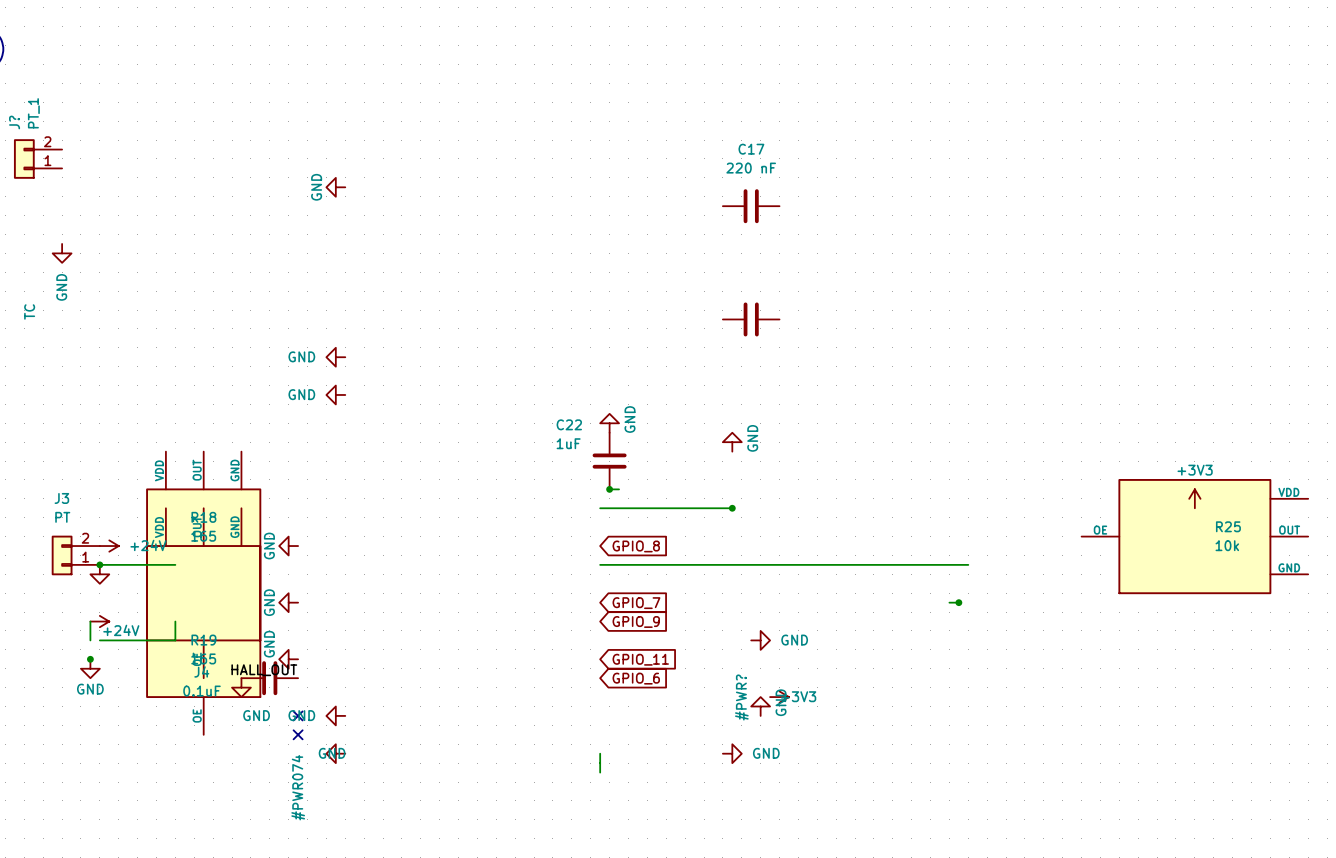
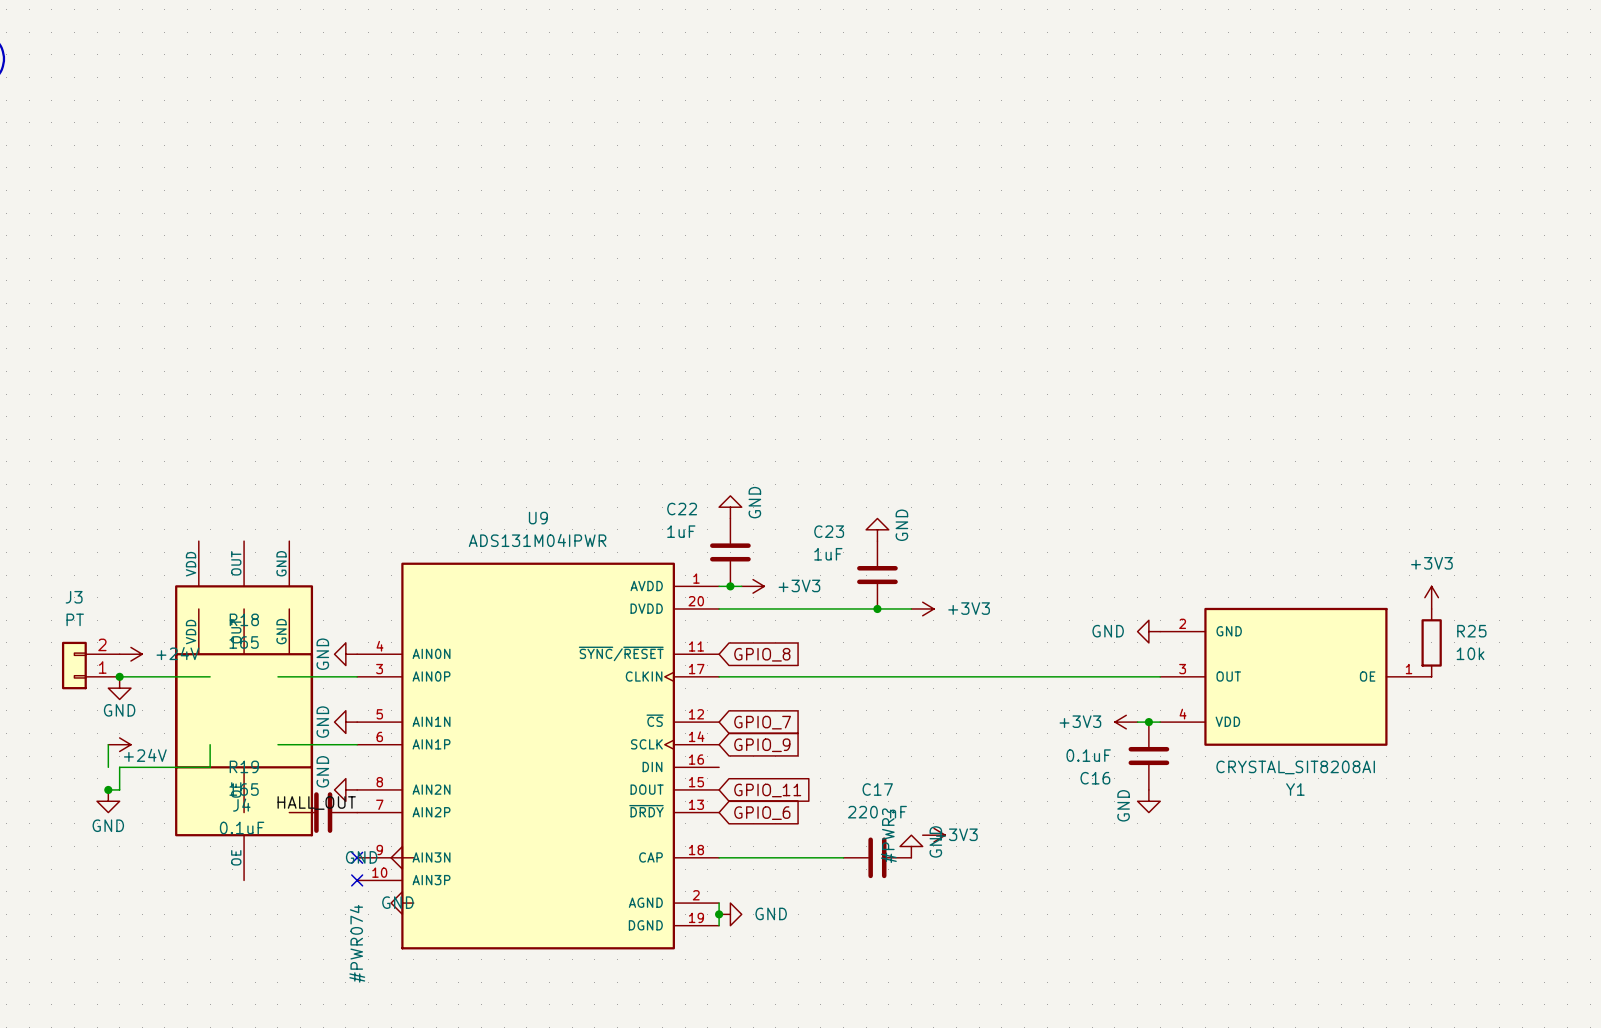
J?: PT_1 (38, 158) -> none
power symbol: GND (335, 187) -> none
C17 position: (751, 206) -> (877, 857)
power symbol: GND (62, 253) -> none
part: (751, 319) -> none
power symbol: GND (335, 357) -> none
power symbol: GND (335, 394) -> none
C23: none -> 1uF (877, 575)
R25 symbol: [1081, 479, 1309, 595] -> [1421, 608, 1442, 677]
wire: none -> (719, 586) (730, 586)
power symbol: none -> +3V3 (753, 586)
wire: none -> (877, 608) (911, 608)
power symbol: none -> +3V3 (922, 608)
power symbol: none -> GND (1148, 631)
wire: none -> (277, 676) (357, 676)
Y1: none -> CRYSTAL_SIT8208AI (1295, 676)
power symbol: TC (99, 574) -> GND (119, 688)
power symbol: none -> +3V3 (1126, 722)
wire: none -> (1148, 722) (1160, 722)
wire: none -> (277, 744) (357, 744)
U9: none -> ADS131M04IPWR (538, 756)
C16: none -> 0.1uF (1148, 756)
wire: none -> (119, 767) (119, 789) (108, 789)
power symbol: GND (760, 640) -> none
power symbol: none -> GND (1148, 801)
power symbol: GND (241, 687) -> none
wire: none -> (719, 857) (843, 857)
power symbol: GND (732, 753) -> none
junction: none -> (719, 914)
power symbol: none -> GND (730, 914)

